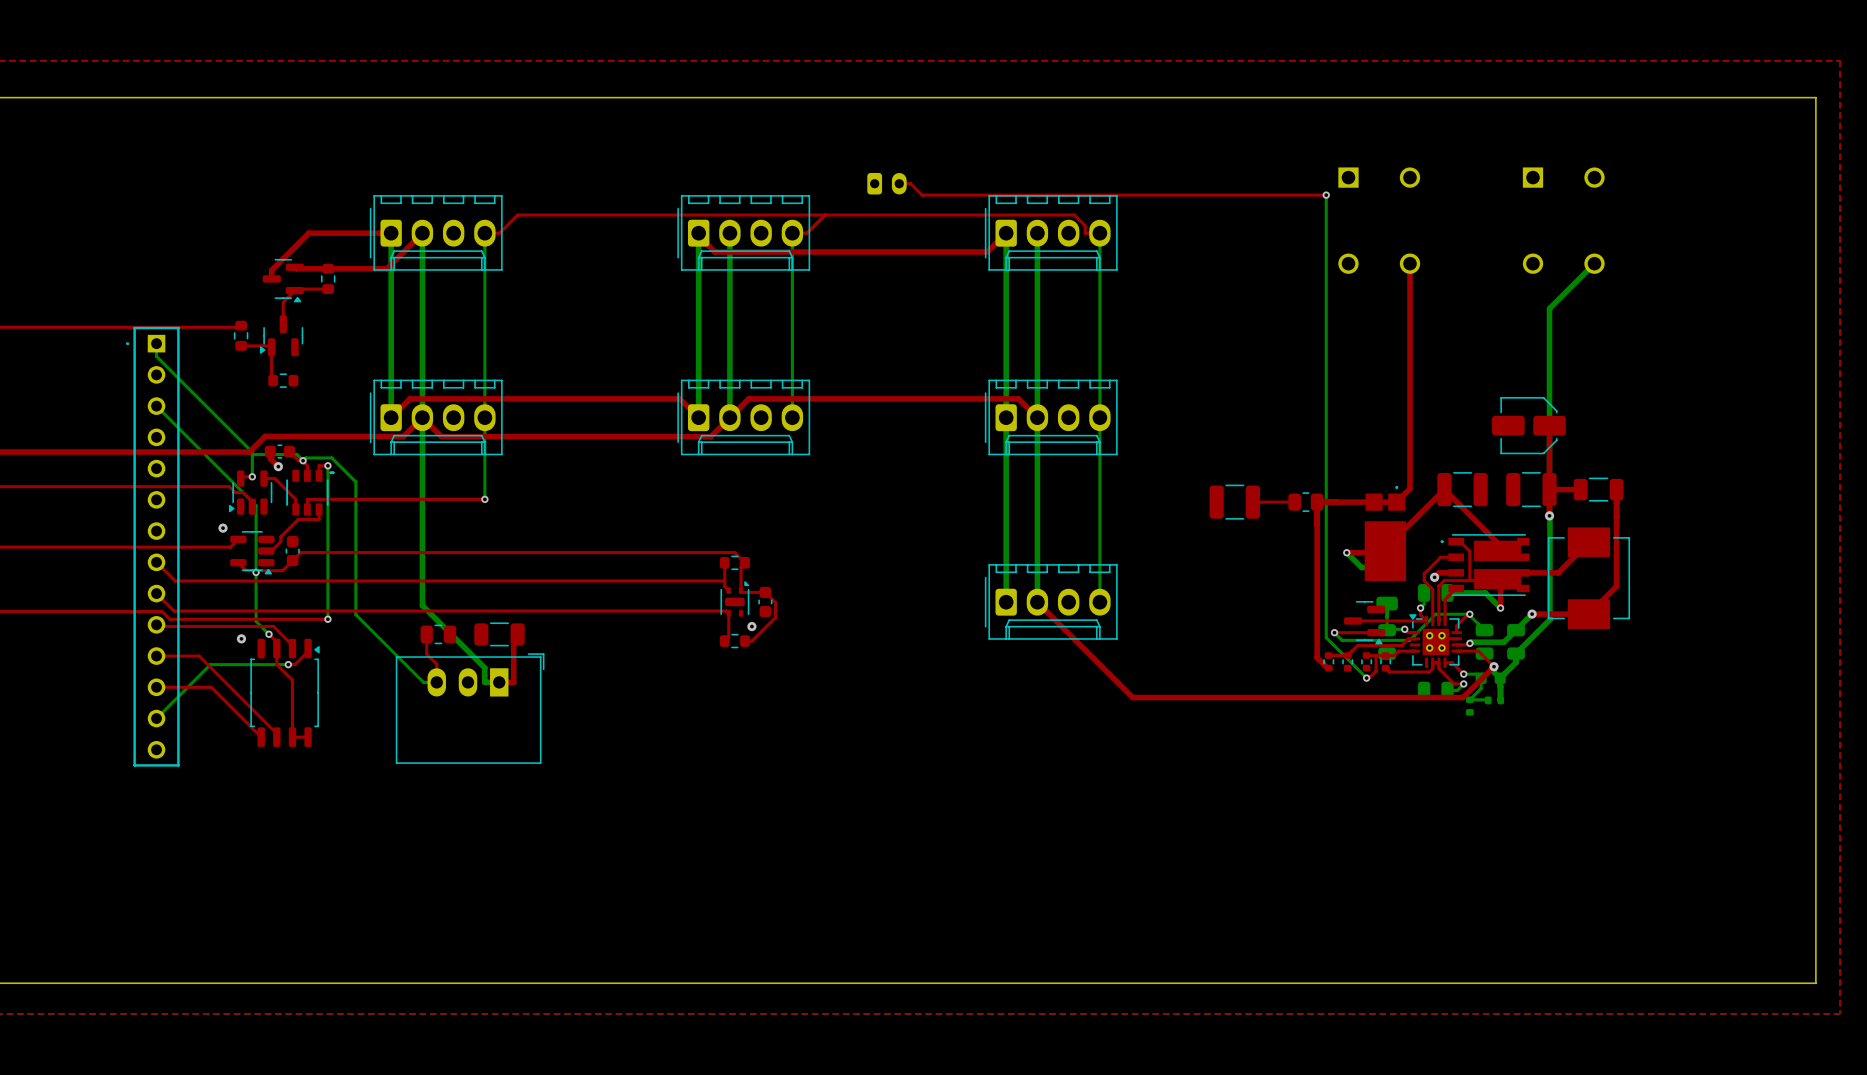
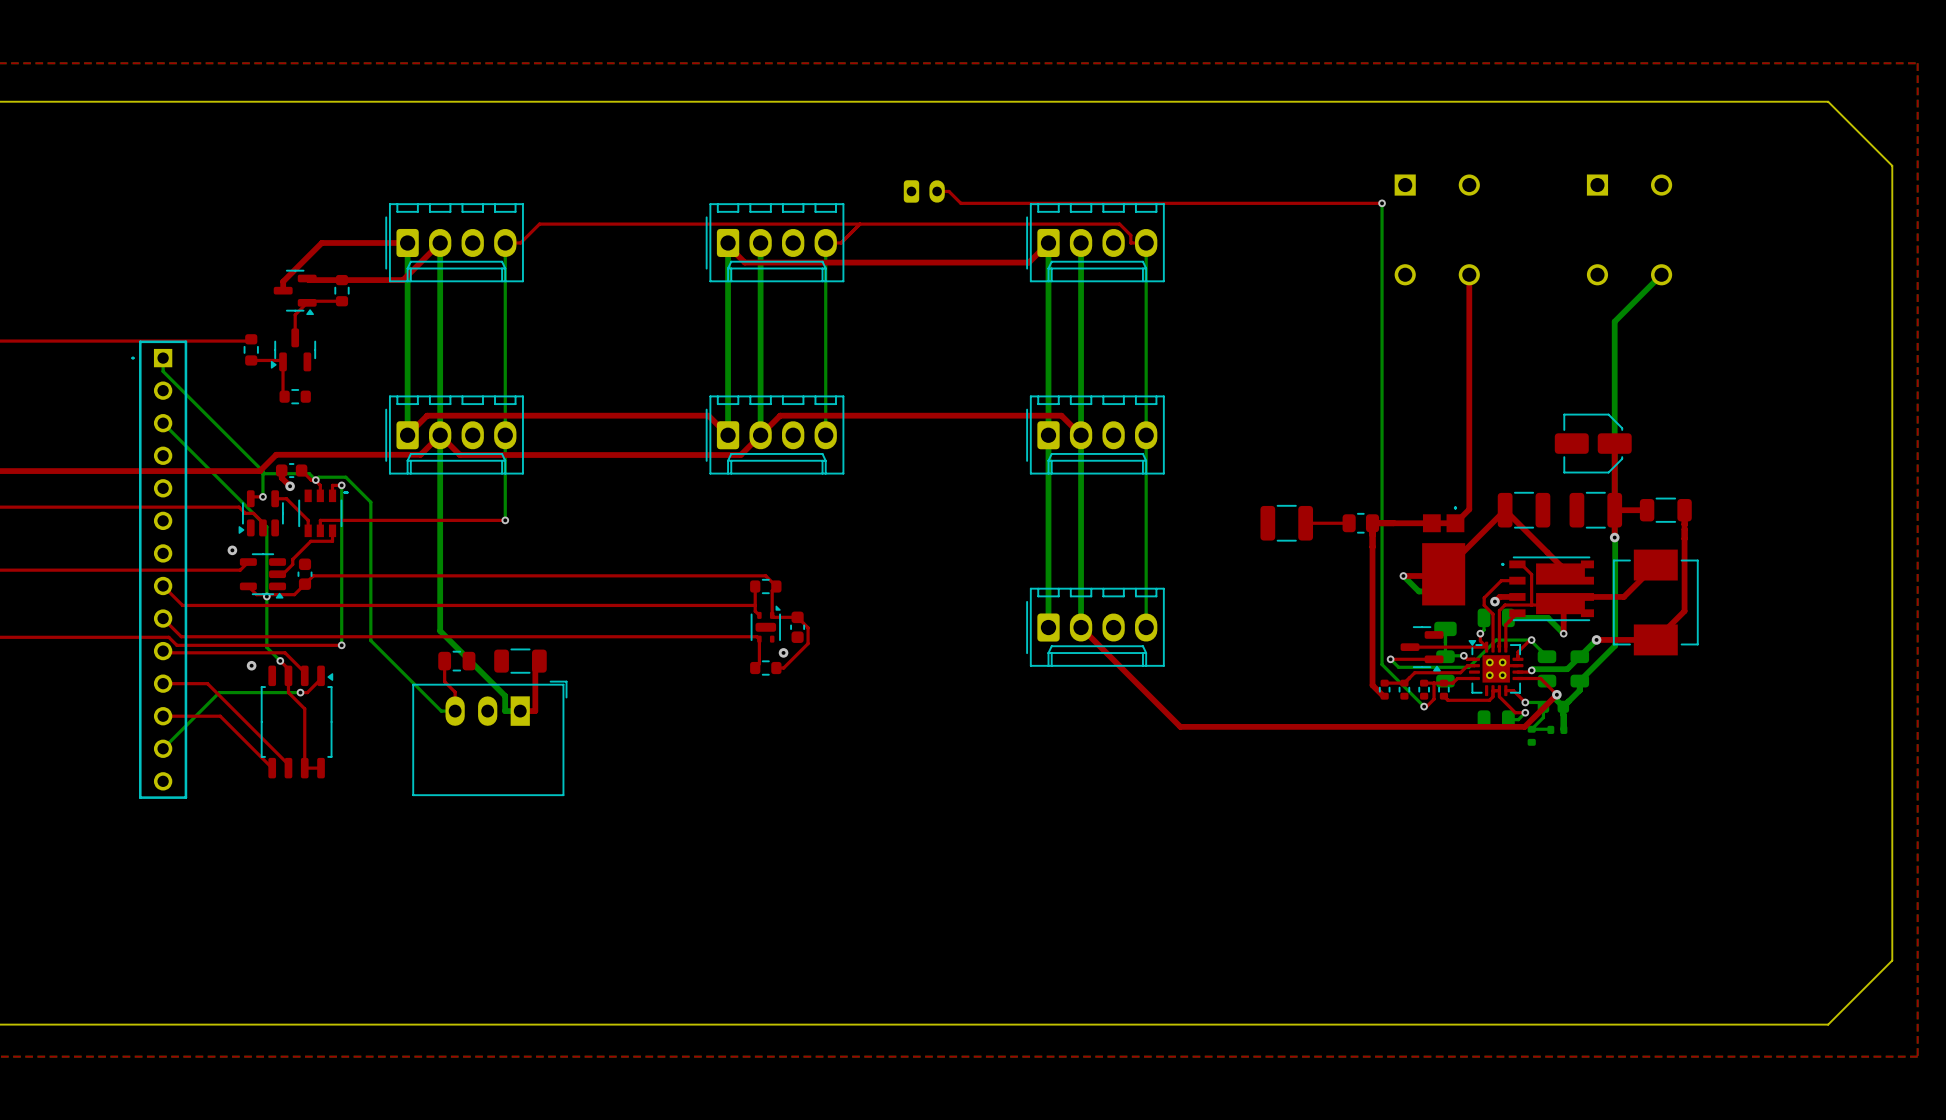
board edge: (1754, 97) (1815, 97) (1815, 159) -> (1828, 101) (1892, 165)
board edge: (1815, 921) (1815, 983) (1754, 983) -> (1892, 960) (1828, 1024)

